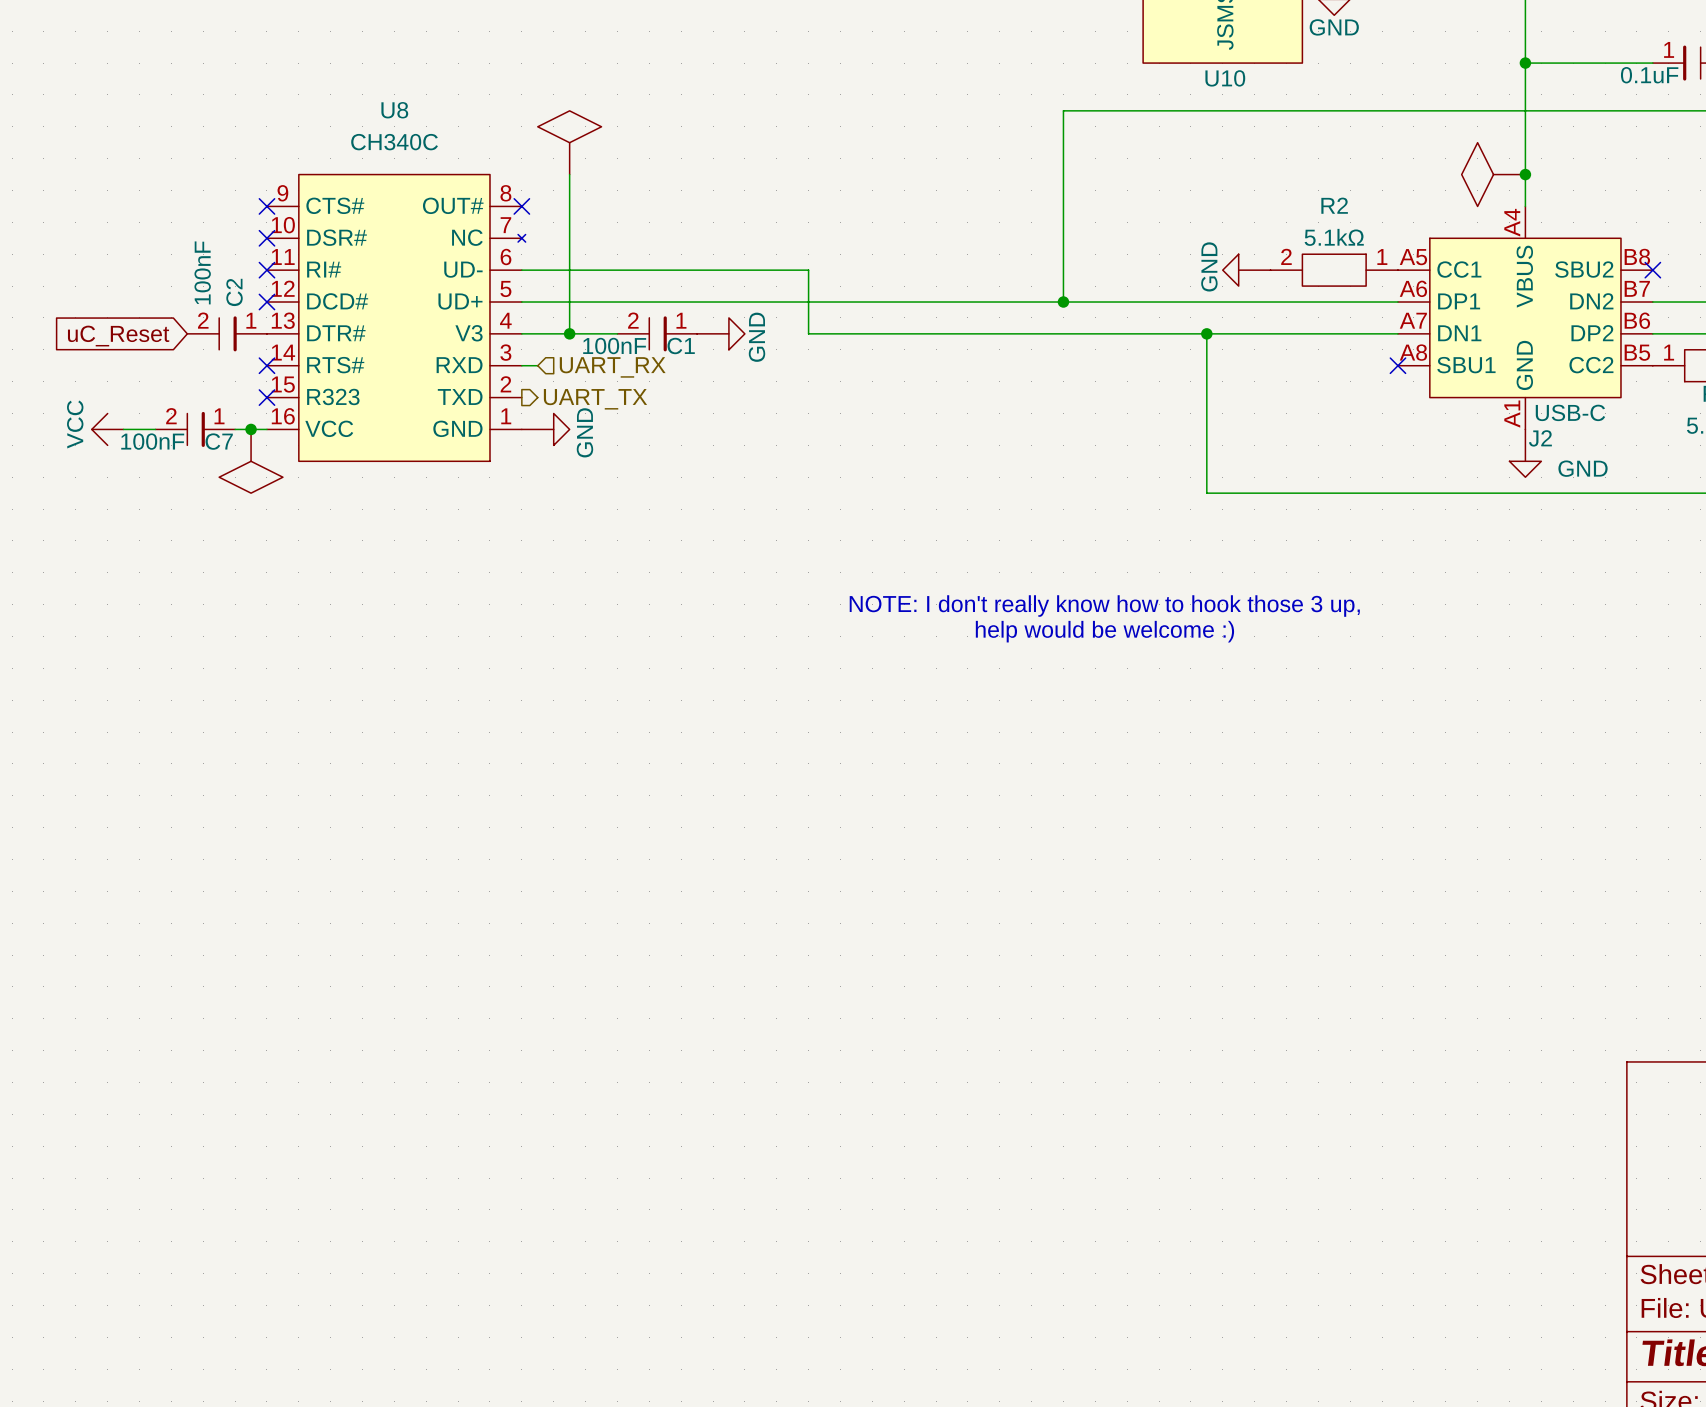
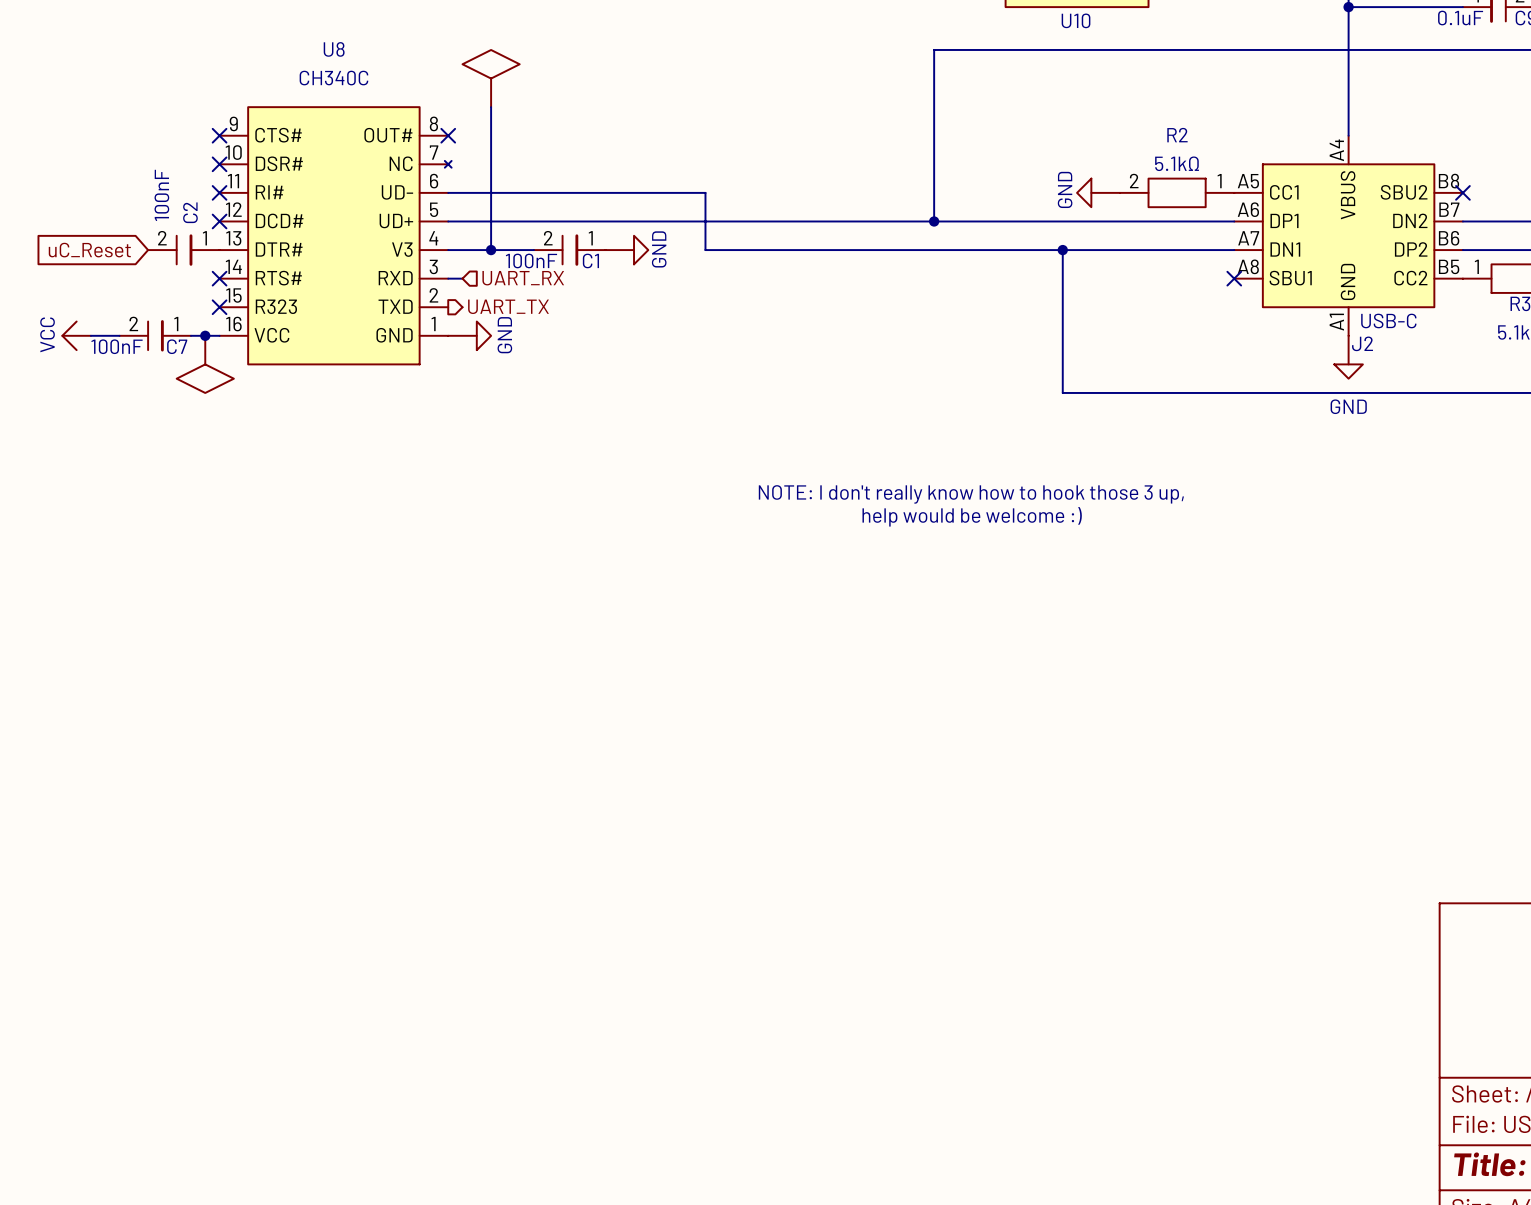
power symbol: (1493, 174) -> none
junction: (1525, 174) -> none
power symbol text position: GND (1583, 468) -> GND (1348, 406)

